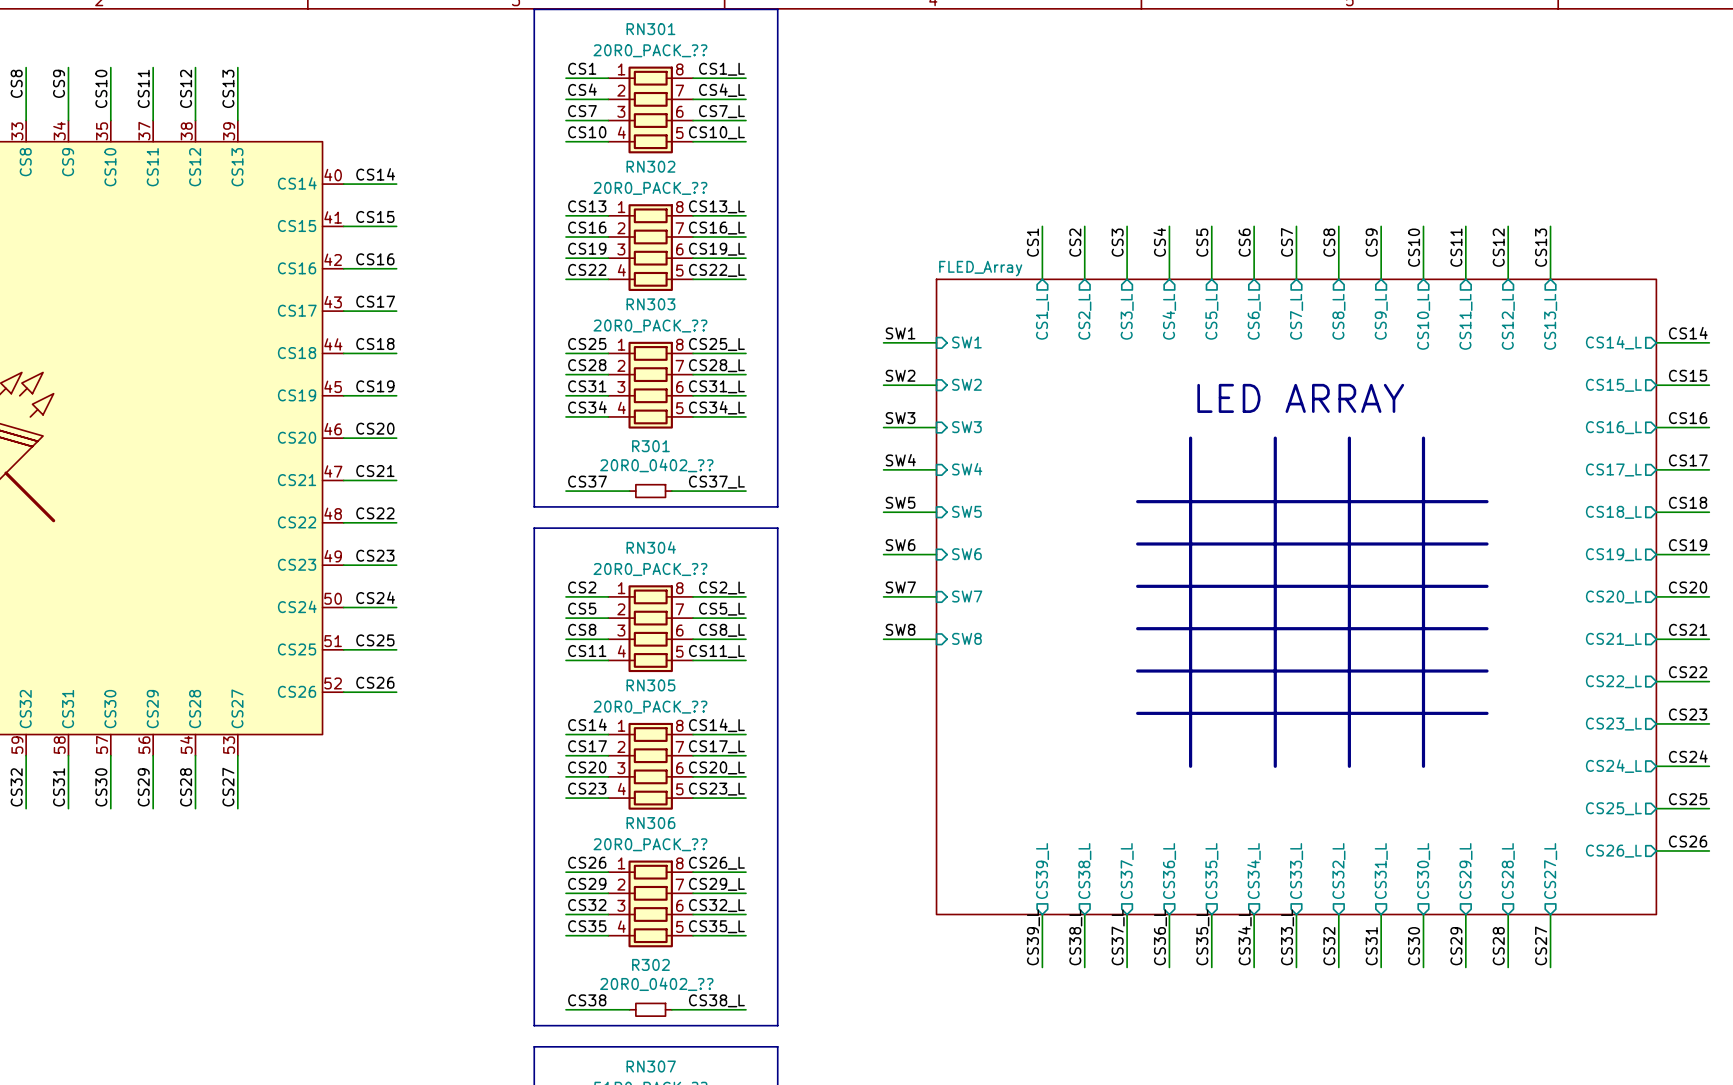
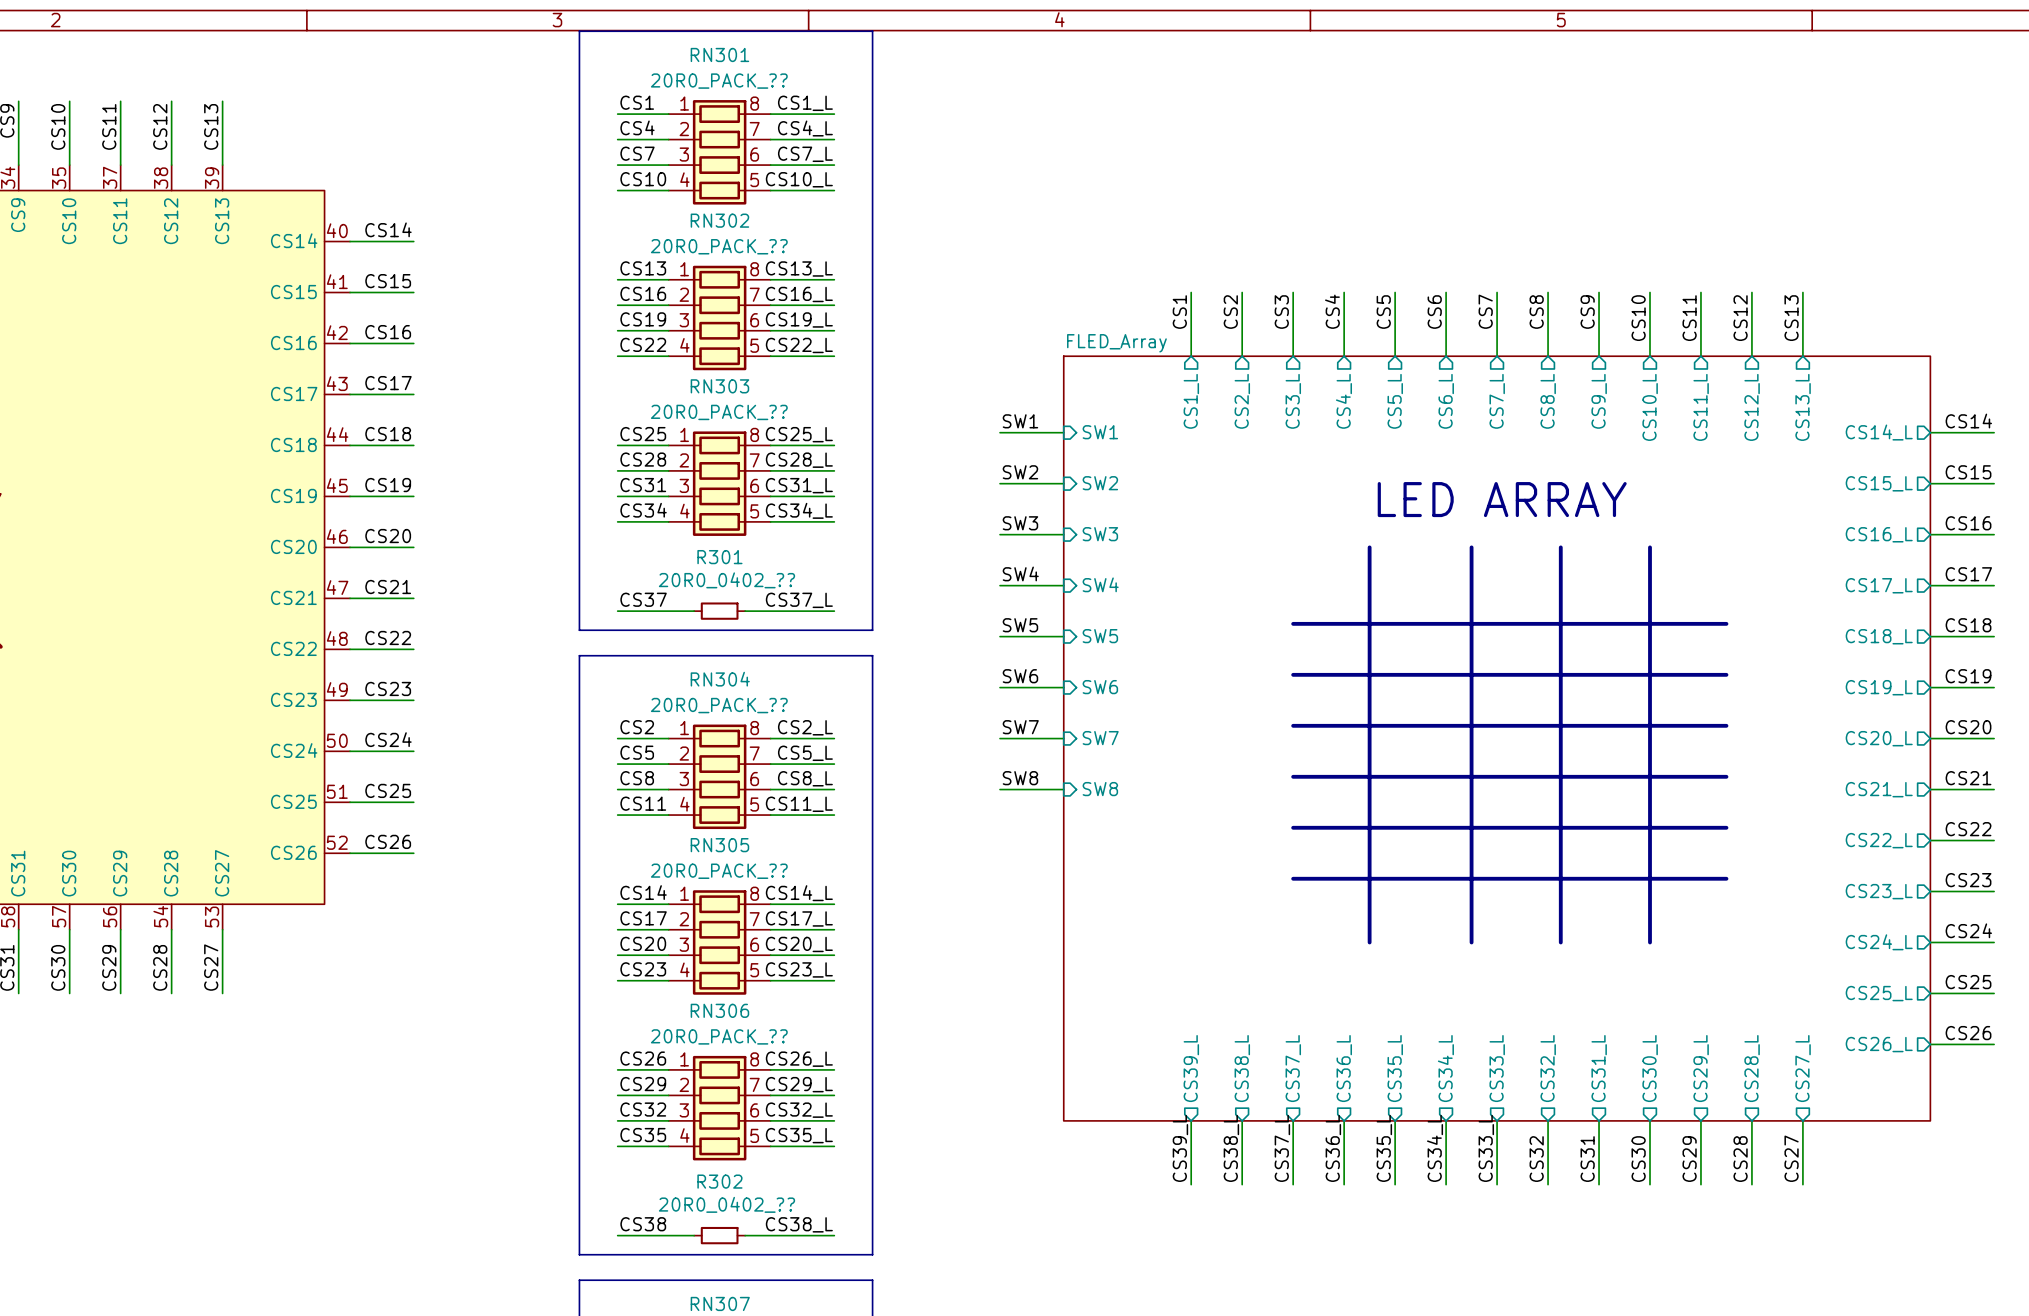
line: none -> (1293, 623) (1305, 623)
line: none -> (1293, 674) (1305, 674)
line: none -> (1293, 725) (1305, 725)
line: none -> (1293, 776) (1305, 776)
line: none -> (1293, 827) (1305, 827)
line: none -> (1293, 878) (1305, 878)

